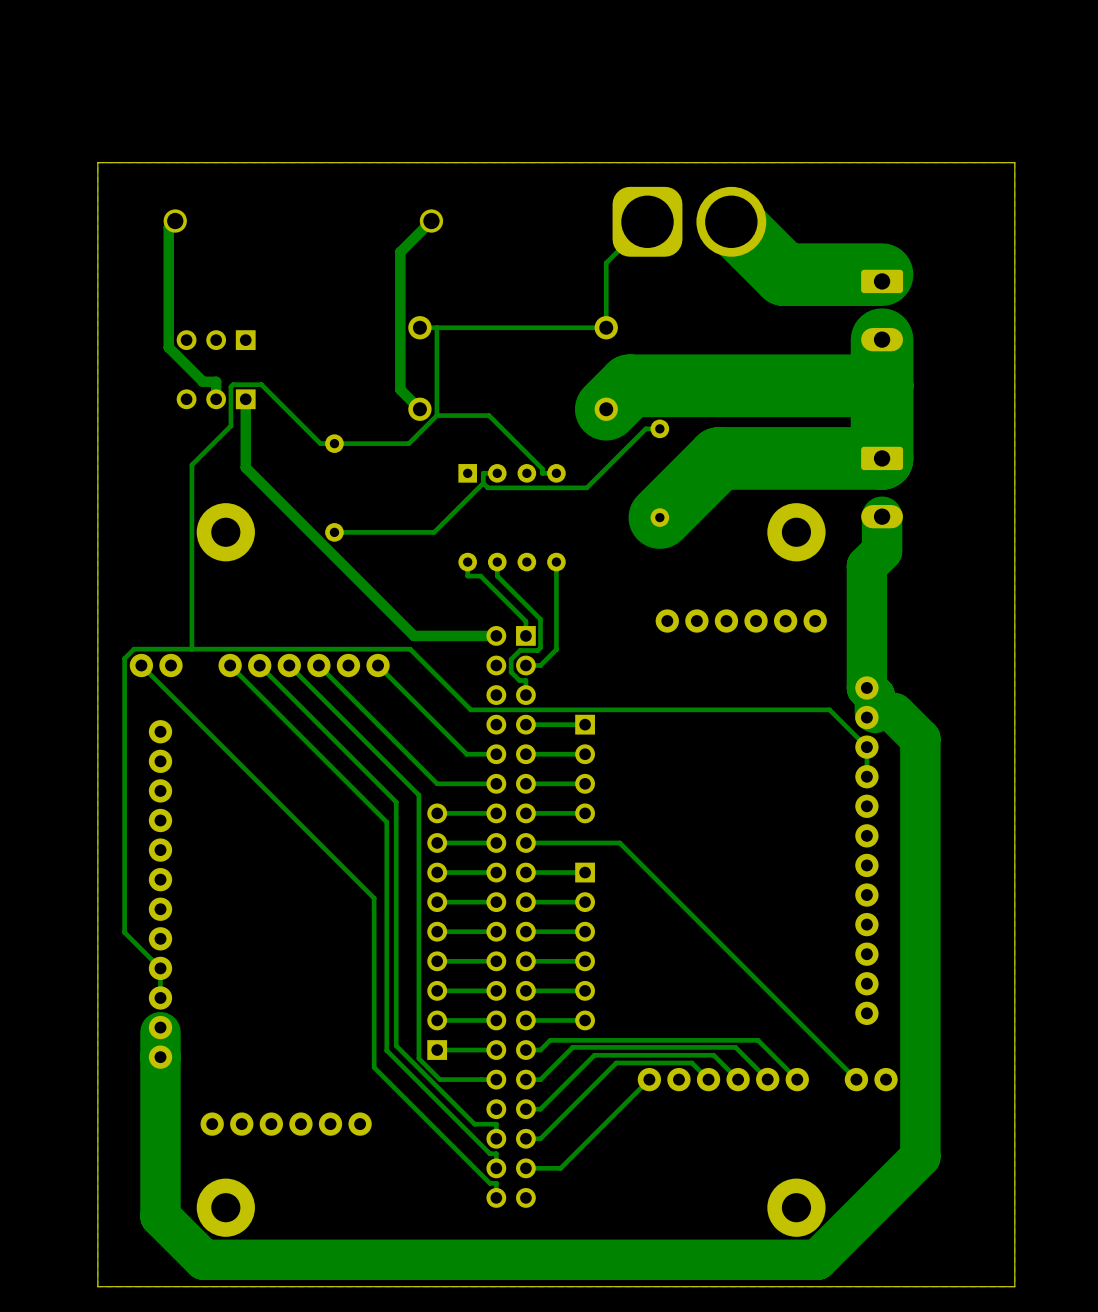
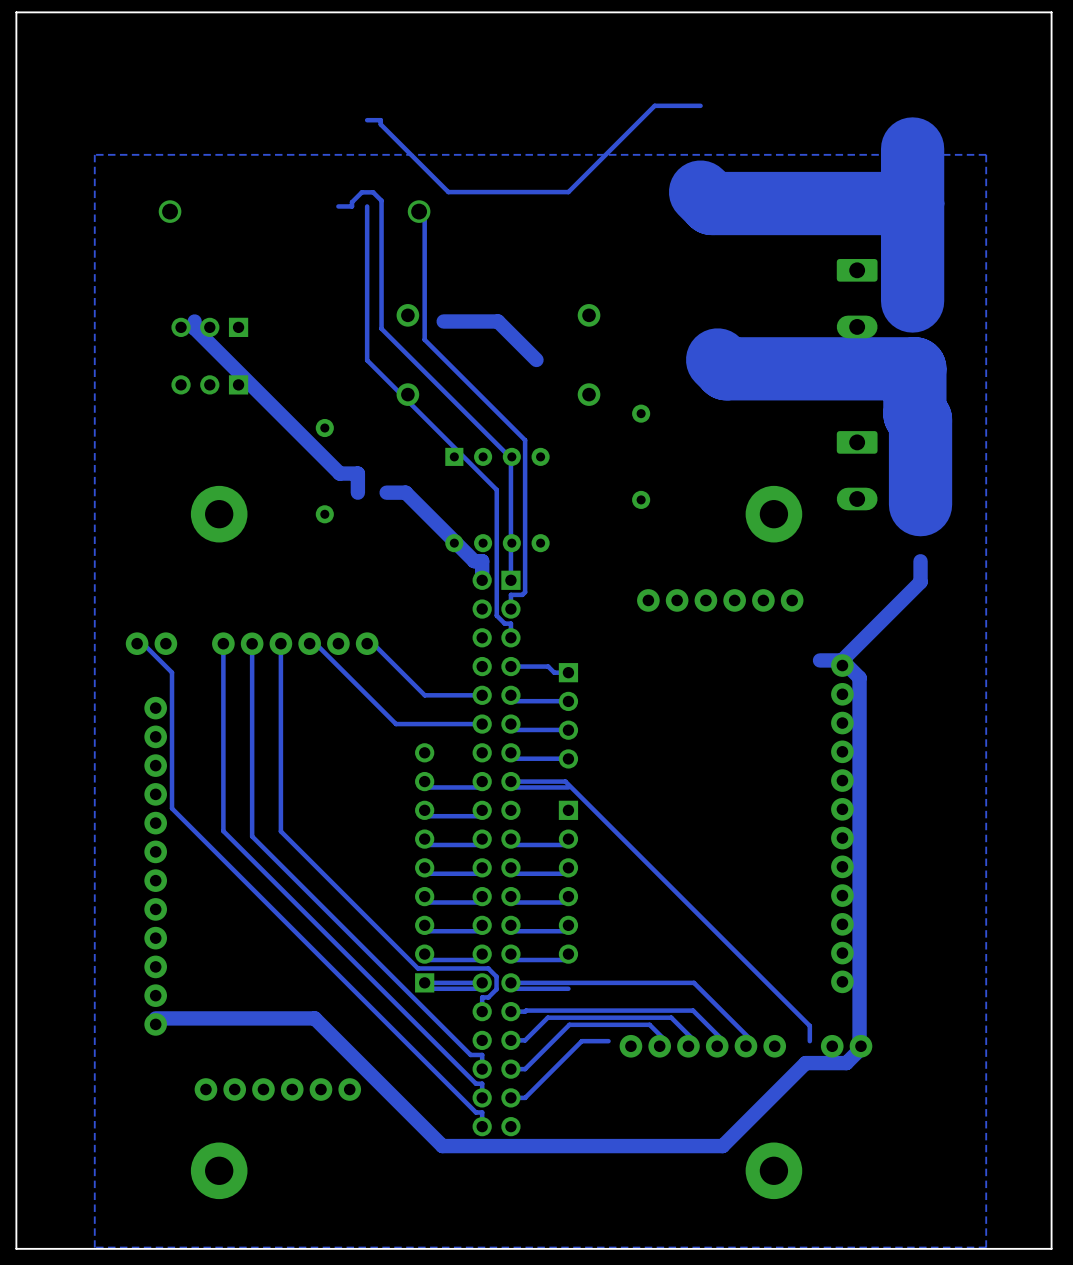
track: none -> (700, 105) (654, 105) (568, 192) (448, 192) (380, 124) (380, 120) (367, 120)
track: none -> (912, 148) (912, 301) (914, 303) (914, 312)
board edge: (1014, 162) (97, 162) (97, 1286) (1014, 1286) (1014, 162) -> (1051, 12) (1051, 1248) (16, 1248) (16, 12) (1051, 12)
track: none -> (700, 192) (712, 203) (912, 203)
track: none -> (338, 206) (352, 206) (352, 202) (361, 192) (373, 192) (381, 200) (381, 328) (510, 458) (510, 580)
track: none -> (367, 206) (367, 360) (496, 489) (496, 615) (504, 623) (510, 623) (510, 637)
track: (175, 221) (168, 227) (168, 347) (203, 381) (216, 381) (216, 399) -> none
track: (431, 221) (400, 252) (400, 389) (419, 409) -> none
track: (647, 221) (606, 263) (606, 327) (419, 327) -> none
part: (689, 221) -> none
track: (731, 221) (784, 274) (882, 274) -> none
track: (436, 327) (436, 415) -> none
track: none -> (194, 321) (194, 328) (339, 473) (357, 473) (357, 492)
track: none -> (443, 321) (498, 321) (536, 359)
track: (882, 339) (882, 458) (719, 458) (659, 517) -> none
track: none -> (717, 359) (726, 368) (914, 368) (914, 414) (920, 419) (920, 504)
track: (882, 385) (629, 385) (606, 409) -> none
track: (245, 399) (245, 467) (413, 635) (496, 635) -> none
track: (436, 415) (489, 415) (542, 468) (542, 473) (556, 473) -> none
track: (436, 415) (408, 443) (320, 443) (261, 384) (233, 384) (230, 386) (230, 425) (191, 464) (191, 649) -> none
track: (659, 428) (645, 428) (586, 487) (487, 487) (483, 483) -> none
track: (497, 473) (483, 473) (483, 483) -> none
track: (483, 483) (434, 532) (334, 532) -> none
track: none -> (386, 492) (405, 492) (474, 561) (482, 561) (482, 580)
track: (882, 516) (882, 550) (866, 566) (866, 687) (874, 695) (874, 712) (870, 717) (866, 717) (871, 712) (894, 712) (920, 739) (920, 1156) (817, 1259) (203, 1259) (160, 1216) (160, 1027) -> none
track: (467, 562) (467, 576) (480, 576) (525, 621) -> (424, 206) (424, 339) (525, 440) (525, 592) (522, 594) (510, 594) (510, 600)
track: (497, 562) (497, 576) (540, 619) (540, 647) (537, 650) (520, 650) (511, 659) (511, 672) (519, 680) (525, 680) (525, 695) -> none
track: (556, 562) (556, 649) (540, 665) (525, 665) -> none
track: none -> (920, 561) (920, 582) (842, 660)
track: none -> (252, 637) (252, 836) (470, 1054) (482, 1054) (482, 1069)
track: none -> (280, 637) (280, 831) (417, 968) (488, 968) (496, 976) (496, 989) (488, 997) (482, 997) (482, 1011)
track: none -> (309, 637) (396, 724) (482, 724)
track: none -> (367, 637) (424, 695) (482, 695)
track: (141, 665) (374, 898) (374, 1067) (489, 1183) (496, 1183) (496, 1197) -> none
track: (230, 665) (386, 822) (386, 1050) (489, 1153) (496, 1153) -> (137, 637) (172, 672) (172, 808) (475, 1112) (482, 1112) (482, 1118)
track: (259, 665) (396, 802) (396, 1045) (474, 1124) (496, 1124) -> (223, 637) (223, 831) (475, 1083) (482, 1083) (482, 1089)
track: (289, 665) (418, 795) (418, 1058) (439, 1079) (496, 1079) -> none
track: (318, 665) (437, 783) (496, 783) -> none
track: (378, 665) (466, 754) (496, 754) -> none
track: none -> (842, 660) (820, 660)
track: none -> (842, 660) (859, 677) (859, 1049) (846, 1063) (805, 1063) (722, 1146) (442, 1146) (314, 1018) (155, 1018)
track: none -> (510, 666) (548, 666) (554, 672) (568, 672)
part position: (585, 769) -> (568, 715)
track: (866, 776) (866, 747) (829, 709) (470, 709) (410, 649) (134, 649) (124, 658) (124, 932) (160, 968) (160, 997) -> none
track: none -> (510, 781) (565, 781) (809, 1025) (809, 1041)
track: (525, 842) (619, 842) (856, 1079) -> none
part position: (511, 916) -> (496, 853)
part position: (437, 931) -> (424, 867)
part position: (585, 946) -> (568, 882)
track: none -> (510, 982) (694, 982) (752, 1041)
track: none -> (510, 1011) (693, 1010) (723, 1041)
track: (496, 1050) (437, 1050) -> (482, 982) (424, 982)
track: (525, 1050) (540, 1050) (550, 1040) (758, 1040) (797, 1079) -> none
track: none -> (510, 1040) (525, 1040) (547, 1017) (671, 1017) (694, 1041)
track: none -> (608, 1041) (581, 1041) (525, 1097) (510, 1097)
track: none -> (666, 1041) (649, 1024) (569, 1024) (525, 1069) (510, 1069)
track: (649, 1079) (560, 1168) (525, 1168) -> none
track: (708, 1079) (691, 1062) (616, 1062) (540, 1138) (525, 1138) -> none
track: (738, 1079) (713, 1055) (594, 1055) (540, 1109) (525, 1109) -> none
track: (767, 1079) (735, 1047) (572, 1047) (540, 1079) (525, 1079) -> none

